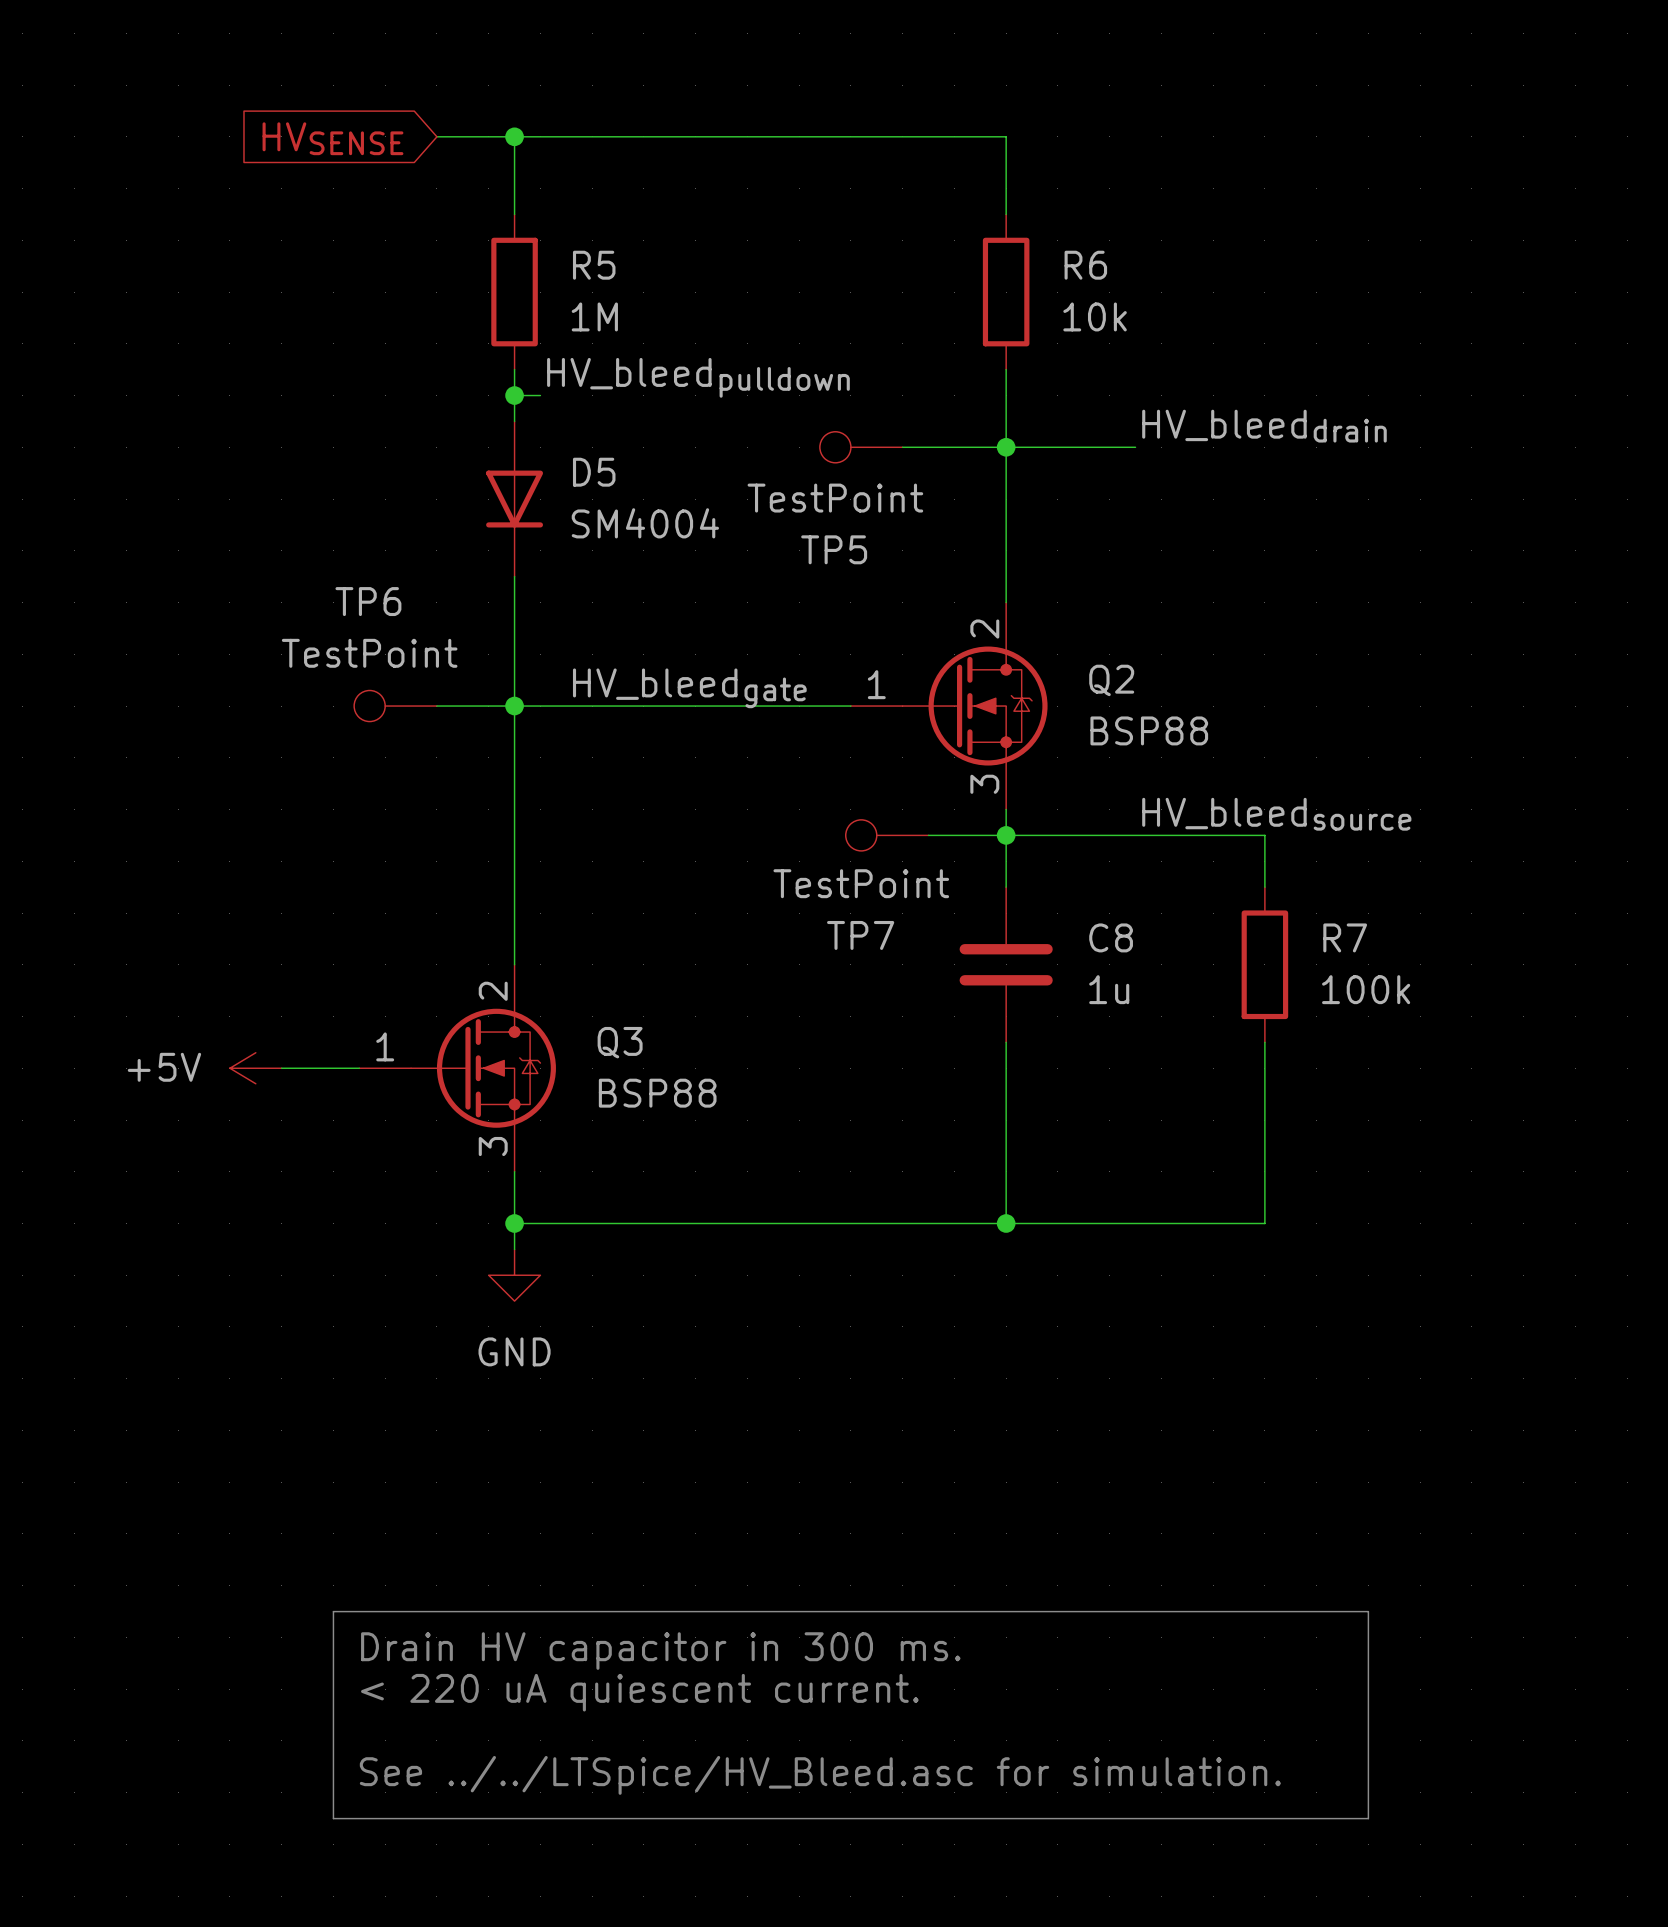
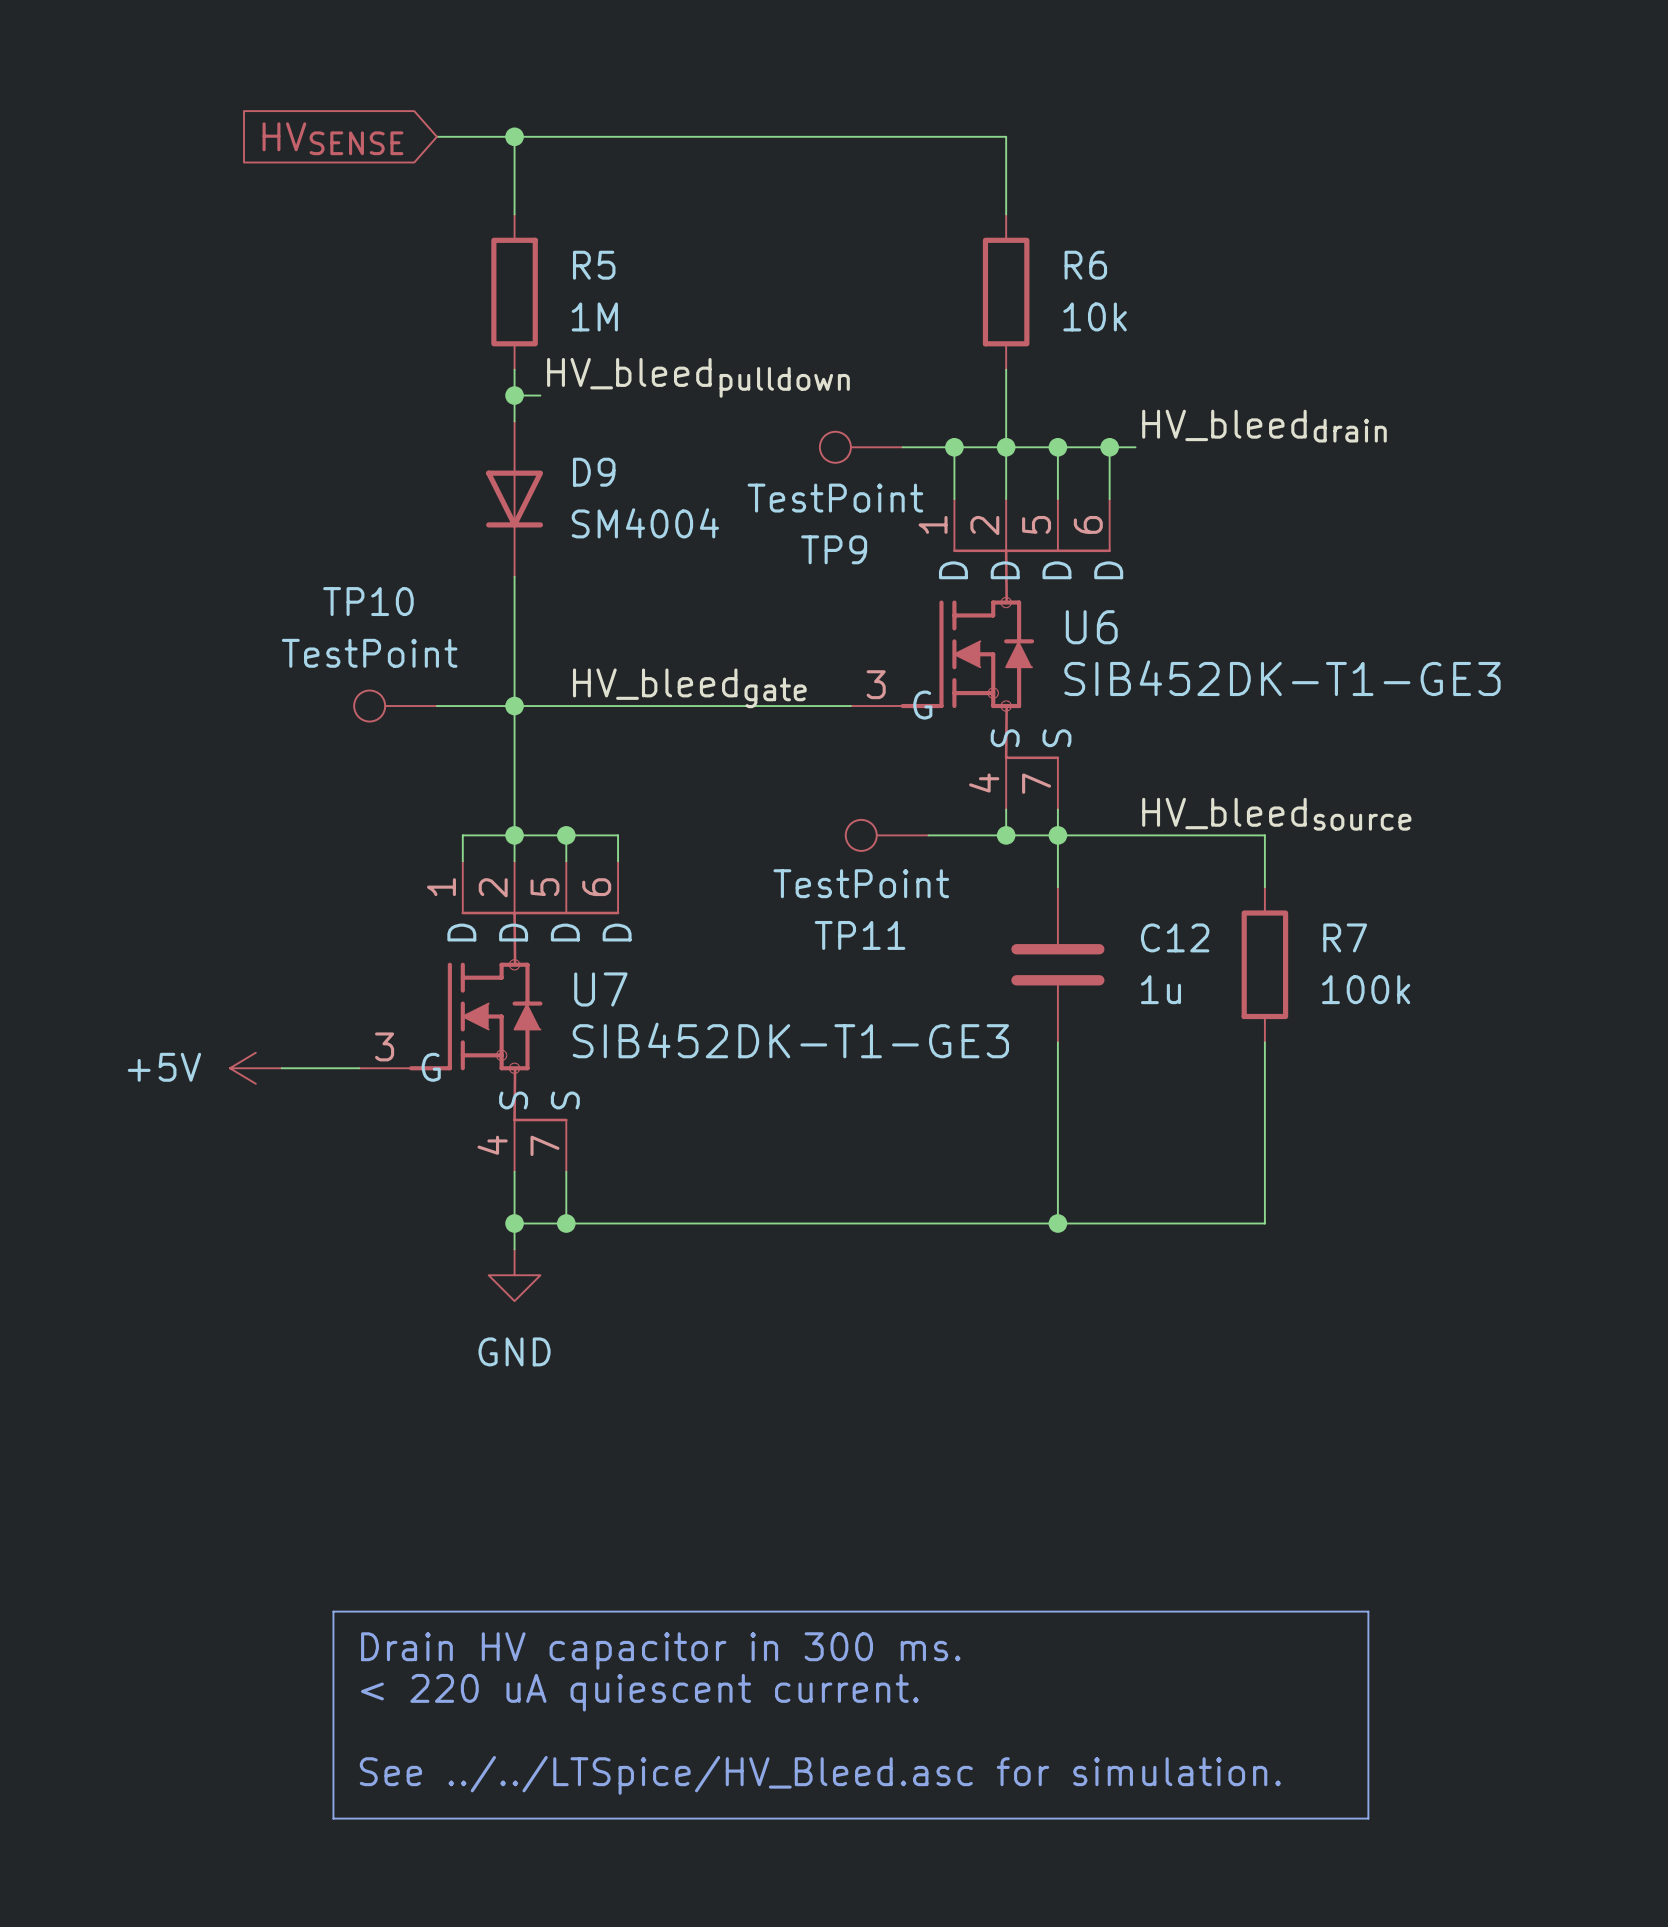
wire: none -> (954, 447) (954, 499)
junction: none -> (954, 447)
junction: none -> (1057, 447)
wire: none -> (1109, 447) (1109, 499)
junction: none -> (1109, 447)
D5 name: D5 (594, 472) -> D9 (594, 472)
TP5 name: TP5 (834, 549) -> TP9 (834, 549)
TP6 name: TP6 (368, 601) -> TP10 (368, 601)
U6: none -> SIB452DK-T1-GE3 (980, 654)
Q2: BSP88 (949, 706) -> none
wire: none -> (1057, 809) (1057, 887)
junction: none -> (514, 835)
wire: none -> (566, 835) (566, 861)
junction: none -> (566, 835)
wire: (1006, 835) (1006, 887) -> (1057, 447) (1057, 499)
junction: none -> (1057, 835)
wire: none -> (462, 861) (462, 835) (618, 835) (618, 861)
TP7 name: TP7 (860, 935) -> TP11 (860, 935)
C8: 1u (1006, 964) -> none
C12: none -> 1u (1057, 964)
U7: none -> SIB452DK-T1-GE3 (489, 1016)
wire: (1006, 1042) (1006, 1223) -> (1057, 1042) (1057, 1223)
Q3: BSP88 (457, 1068) -> none
wire: none -> (566, 1171) (566, 1223)
junction: none -> (566, 1223)
junction position: (1006, 1223) -> (1057, 1223)

